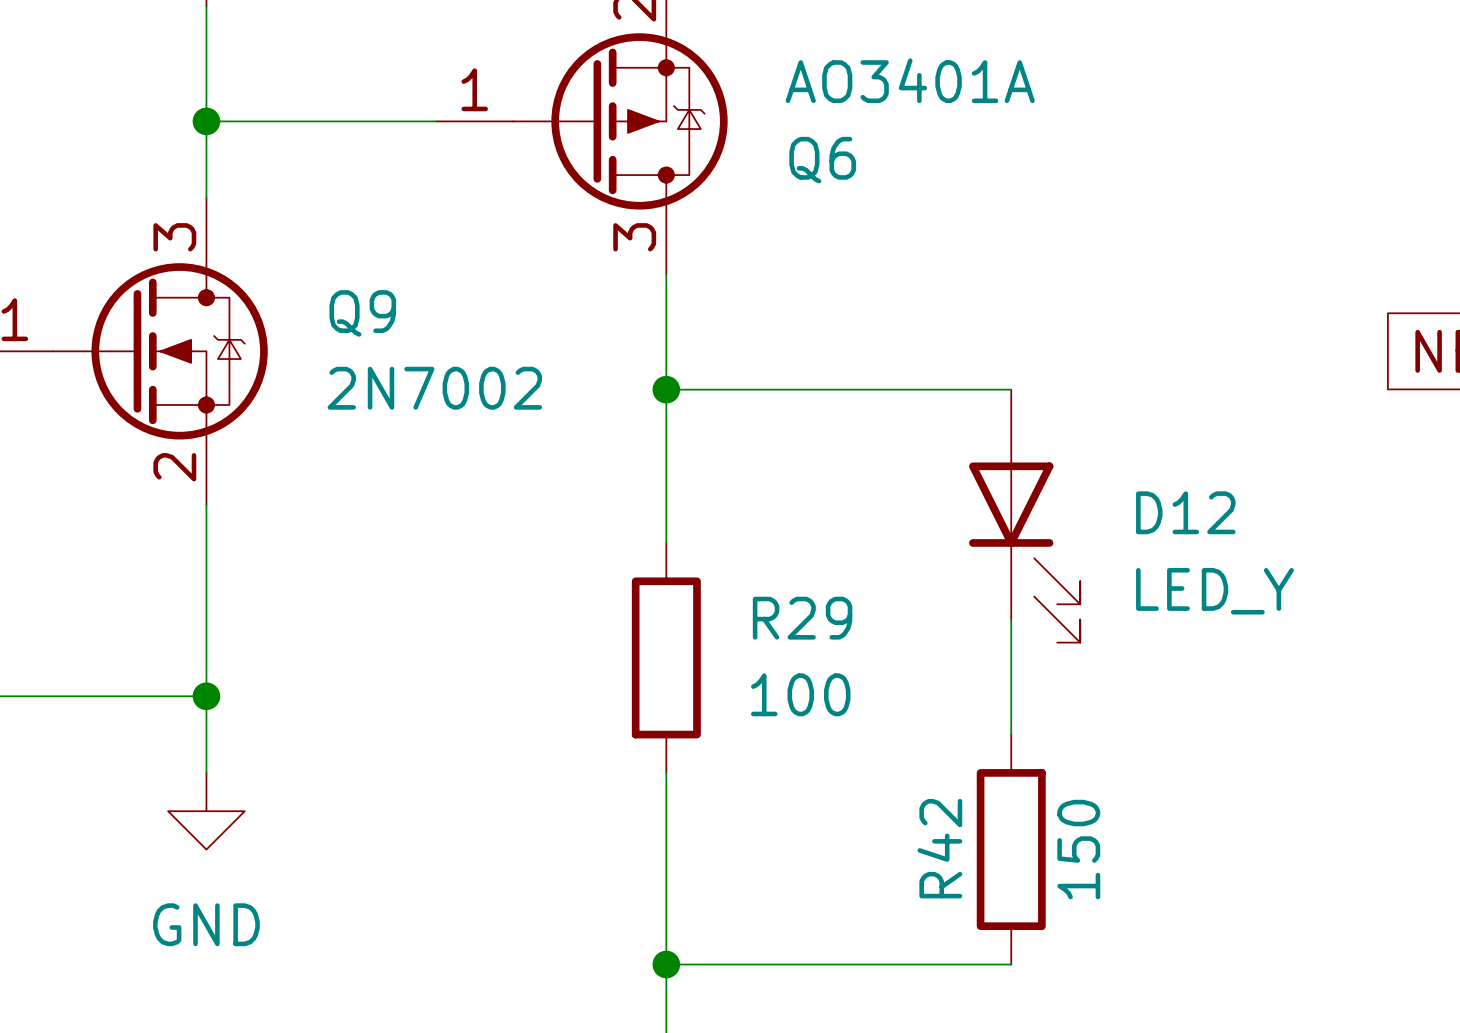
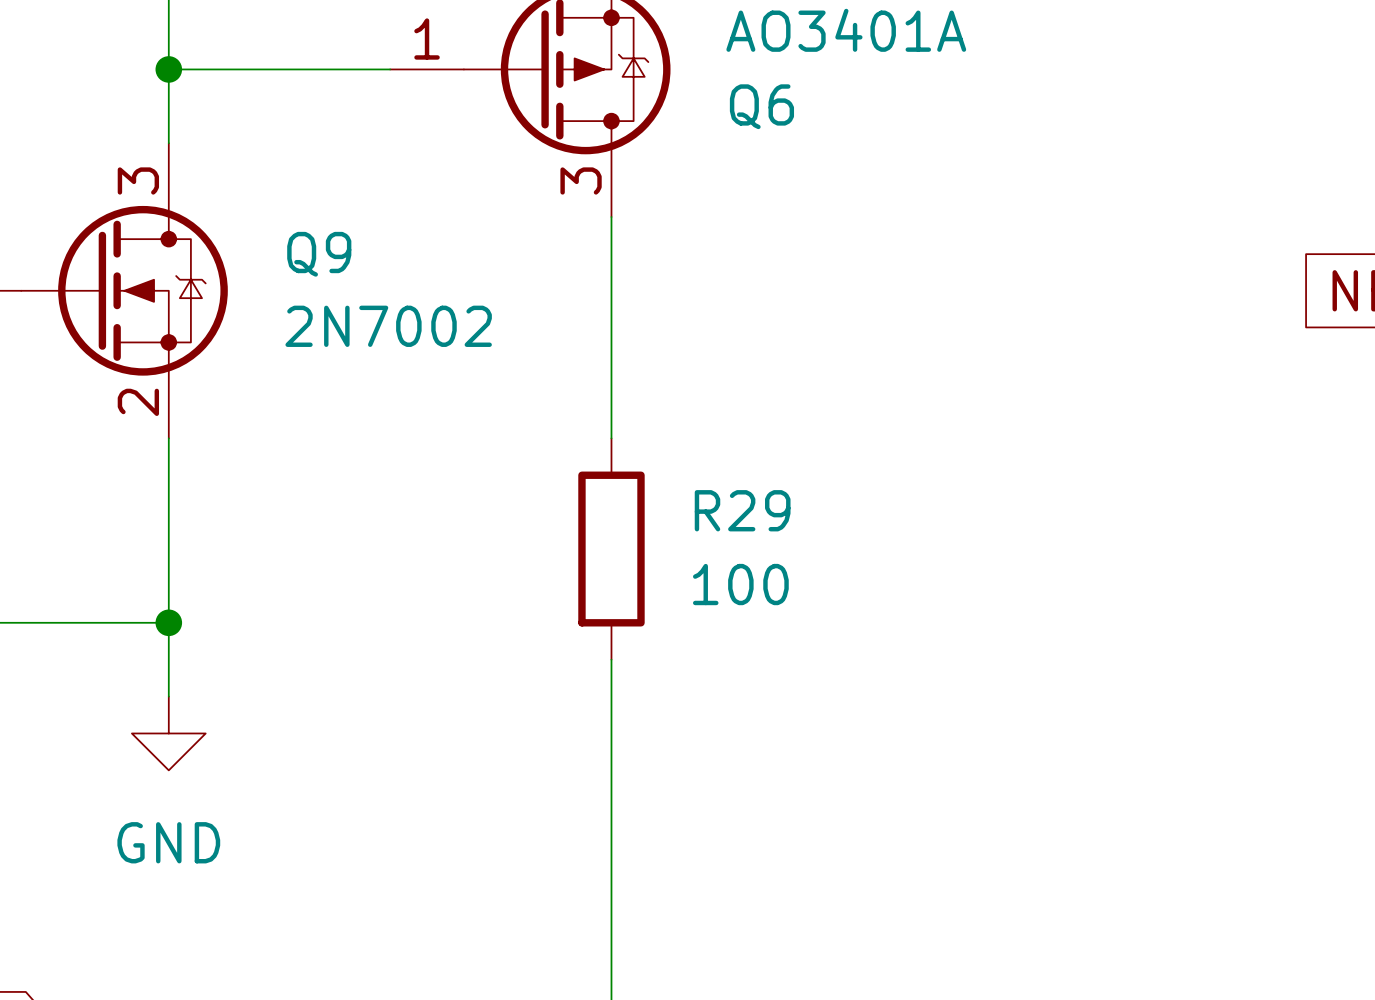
wire: (666, 389) (1011, 389) -> none
junction: (666, 389) -> none
D12: LED_Y (1024, 516) -> none
wire: (1011, 619) (1011, 734) -> none
R29 position: (666, 657) -> (611, 549)
R42: 150 (1011, 849) -> none
wire: (666, 964) (1011, 964) -> none
junction: (666, 964) -> none

